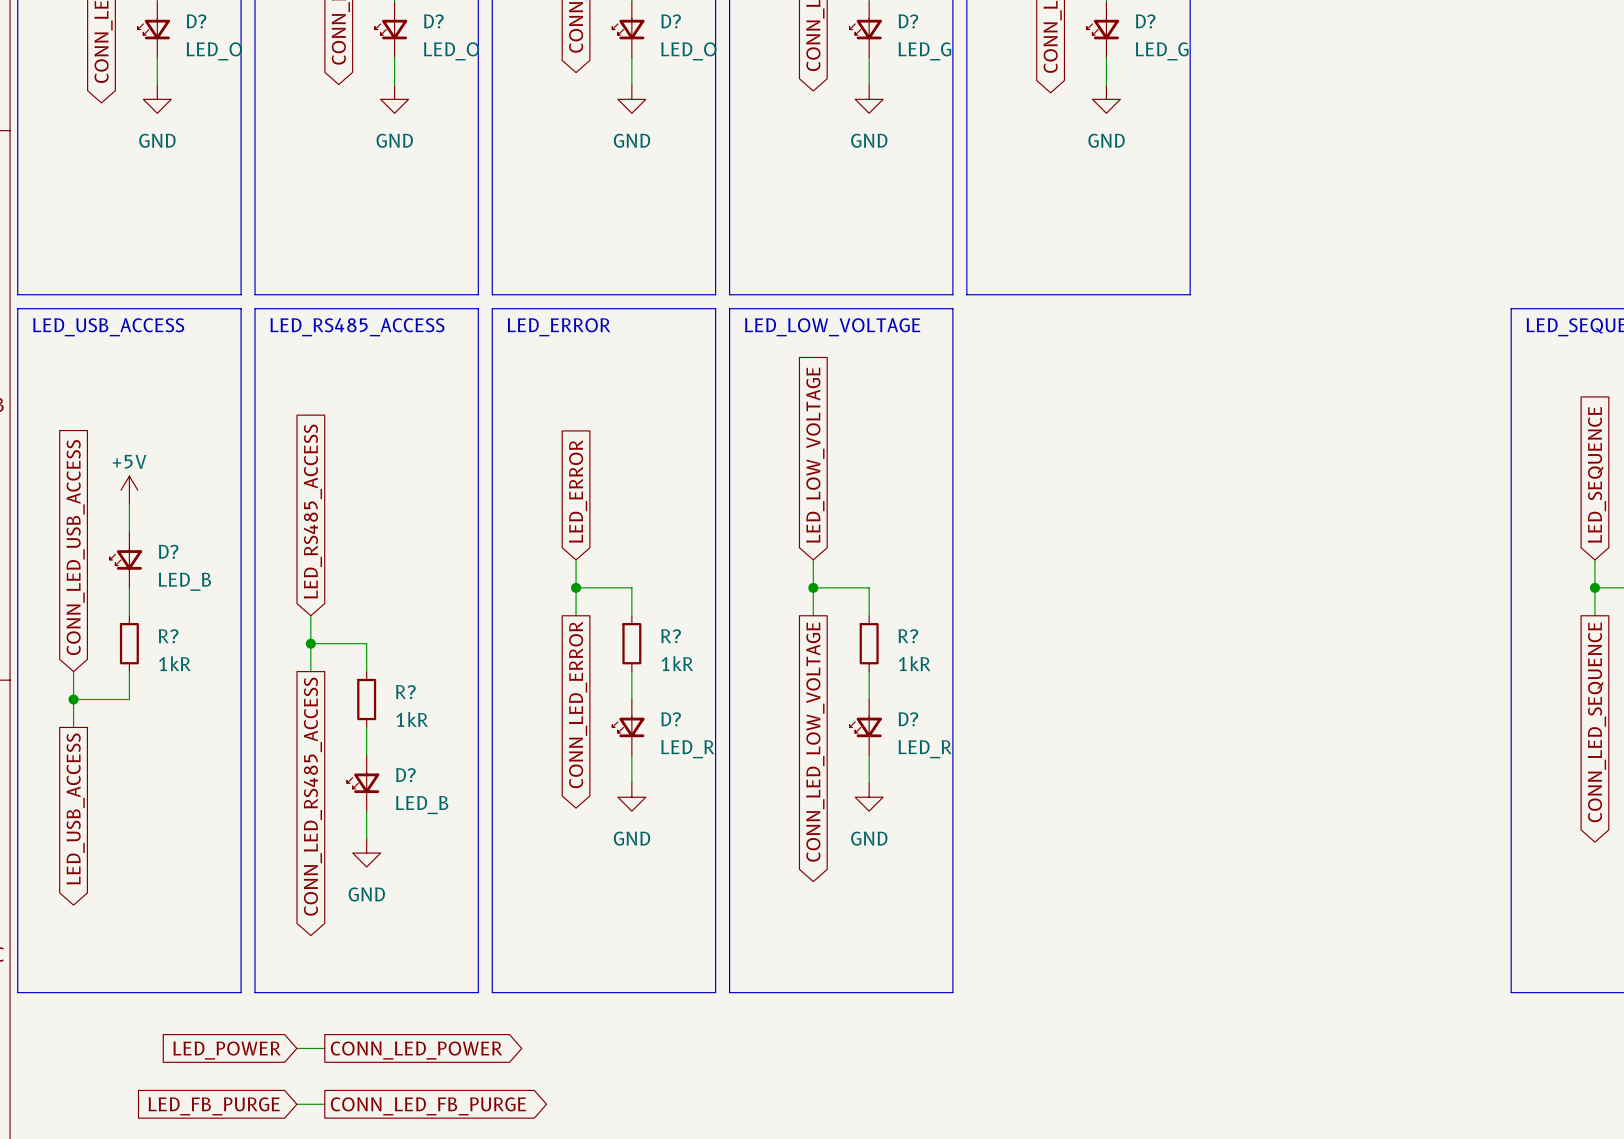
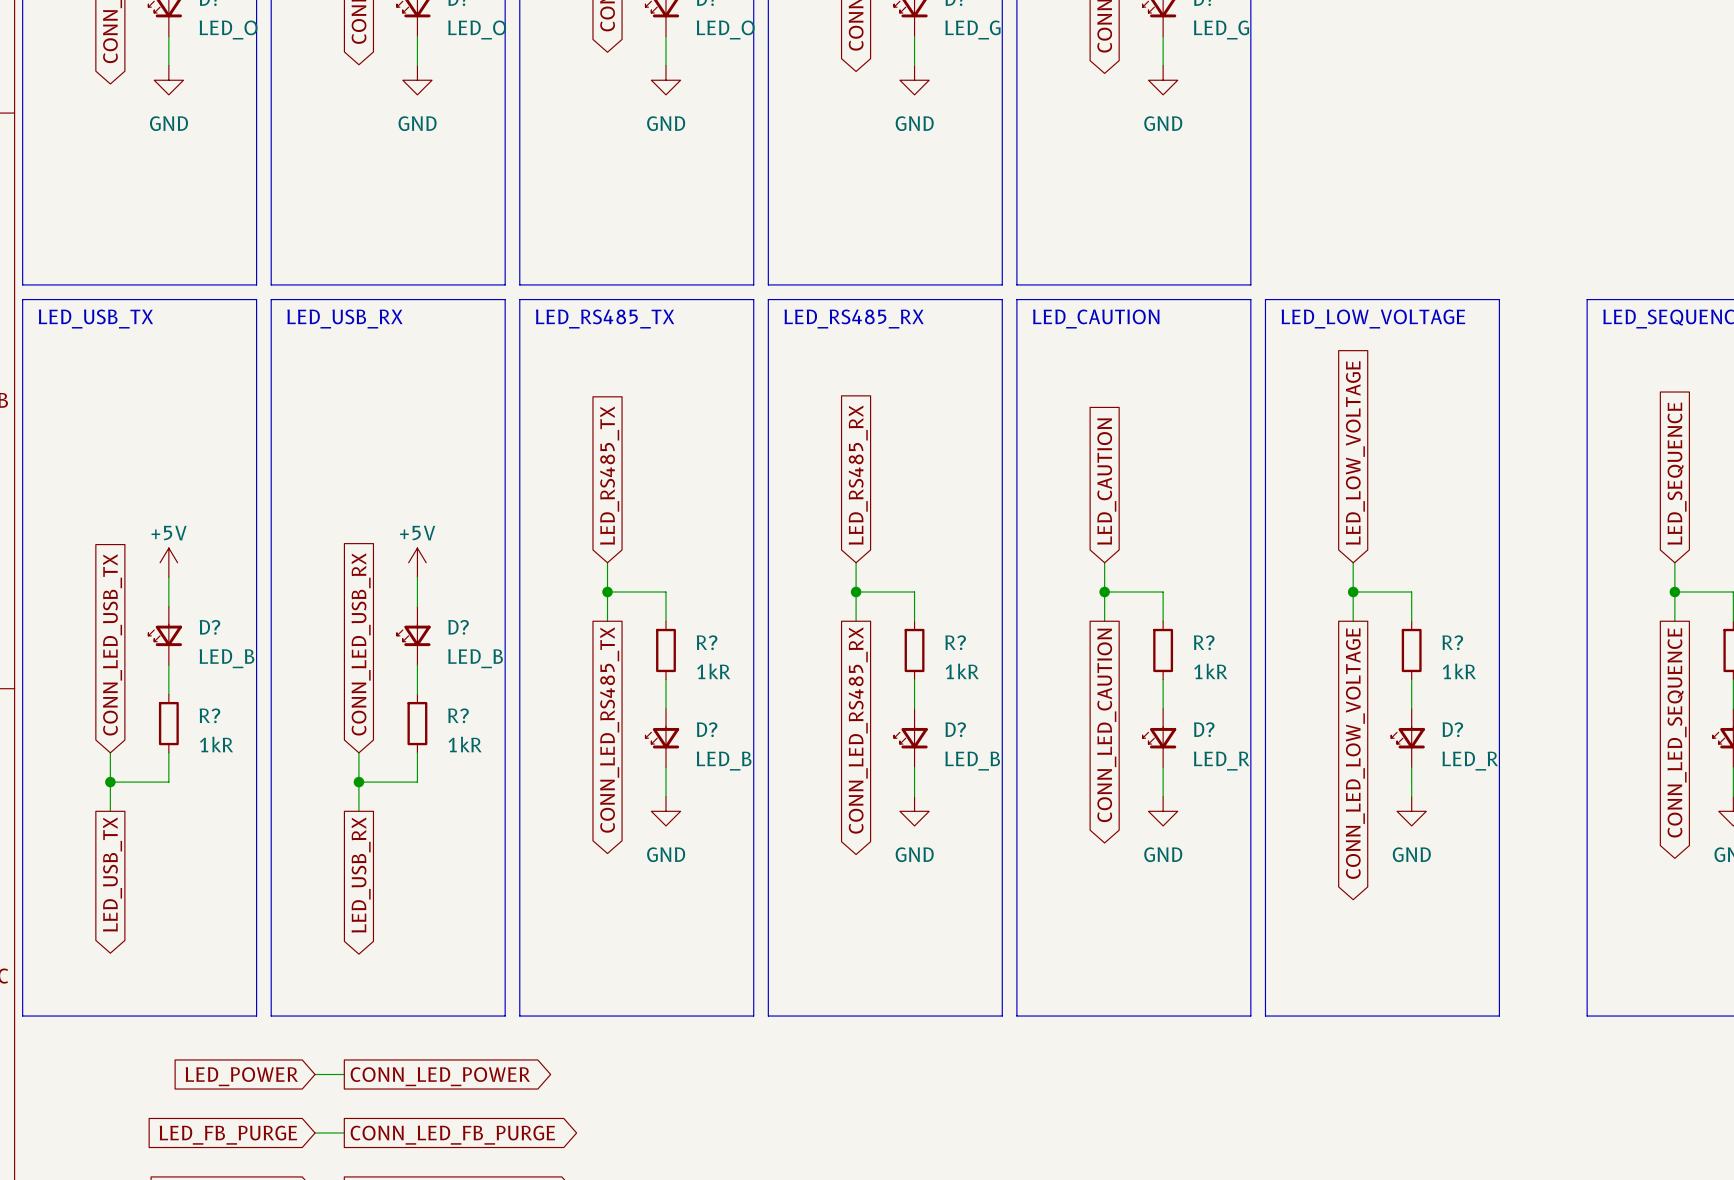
line: none -> (1016, 299) (1250, 299) (1250, 1016) (1016, 1016) (1016, 299)
line: none -> (1265, 299) (1499, 299) (1499, 1016) (1265, 1016) (1265, 299)
text: LED_USB_ACCESS (108, 327) -> LED_USB_TX (95, 319)
text: LED_RS485_ACCESS (357, 327) -> LED_USB_RX (344, 319)
text: LED_ERROR (559, 327) -> LED_RS485_TX (605, 319)
text: LED_LOW_VOLTAGE (832, 327) -> LED_RS485_RX (854, 319)
text: none -> LED_CAUTION (1096, 319)
text: none -> LED_LOW_VOLTAGE (1373, 319)
global label: LED_LOW_VOLTAGE (815, 455) -> LED_RS485_RX (858, 475)
global label: none -> LED_LOW_VOLTAGE (1355, 452)
global label: none -> LED_CAUTION (1106, 481)
power symbol position: +5V (129, 490) -> +5V (168, 562)
global label: LED_ERROR (578, 491) -> LED_RS485_TX (609, 475)
wire: (129, 504) (129, 532) -> (168, 577) (168, 606)
global label: LED_RS485_ACCESS (312, 511) -> none
global label: CONN_LED_USB_ACCESS (75, 547) -> CONN_LED_USB_TX (112, 644)
D? position: (125, 559) -> (165, 635)
power symbol: none -> +5V (417, 562)
wire: none -> (1104, 562) (1104, 621)
wire: none -> (1353, 562) (1353, 621)
wire: (129, 587) (129, 615) -> (168, 665) (168, 694)
wire: none -> (1104, 592) (1163, 592) (1163, 621)
junction: none -> (1104, 592)
wire: none -> (1353, 592) (1411, 592) (1411, 621)
junction: none -> (1353, 592)
wire: (310, 615) (310, 671) -> (358, 752) (358, 811)
D?: none -> LED_B (413, 635)
global label: none -> CONN_LED_USB_RX (361, 644)
R? position: (129, 643) -> (168, 723)
wire: (310, 643) (366, 643) (366, 671) -> none
junction: (310, 643) -> none
R?: none -> 1kR (1163, 650)
R?: none -> 1kR (1411, 650)
wire: (73, 671) (73, 727) -> (110, 752) (110, 811)
wire: (129, 671) (129, 699) (73, 699) -> (168, 752) (168, 782) (110, 782)
wire: none -> (1163, 679) (1163, 708)
wire: none -> (1411, 679) (1411, 708)
junction: (73, 699) -> none
R? position: (366, 699) -> (417, 723)
global label: CONN_LED_ERROR (578, 704) -> CONN_LED_RS485_TX (609, 730)
global label: none -> CONN_LED_CAUTION (1106, 725)
wire: (366, 727) (366, 755) -> (417, 577) (417, 606)
D?: none -> LED_R (1159, 738)
D?: none -> LED_R (1408, 738)
wire: none -> (417, 752) (417, 782) (358, 782)
global label: CONN_LED_LOW_VOLTAGE (815, 742) -> CONN_LED_RS485_RX (858, 730)
global label: none -> CONN_LED_LOW_VOLTAGE (1355, 753)
D? value: LED_R (687, 749) -> LED_B (724, 761)
D? value: LED_R (925, 749) -> LED_B (972, 761)
wire: none -> (1163, 767) (1163, 796)
wire: none -> (1411, 767) (1411, 796)
junction: none -> (110, 782)
junction: none -> (358, 782)
D?: LED_B (363, 783) -> none
global label: CONN_LED_RS485_ACCESS (312, 796) -> none
power symbol: none -> GND (1163, 811)
power symbol: none -> GND (1411, 811)
global label: LED_USB_ACCESS (75, 809) -> LED_USB_TX (112, 874)
wire: (366, 811) (366, 839) -> (417, 665) (417, 694)
power symbol: GND (366, 853) -> none
global label: none -> LED_USB_RX (361, 875)

